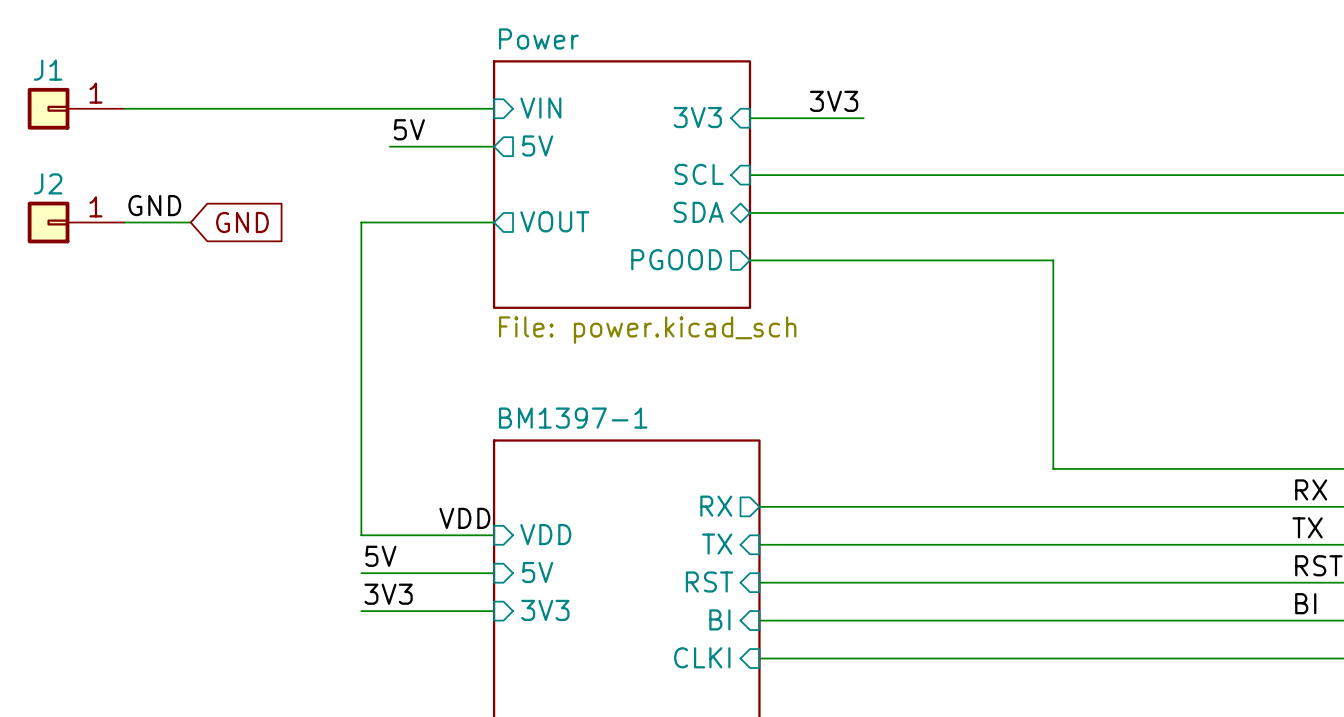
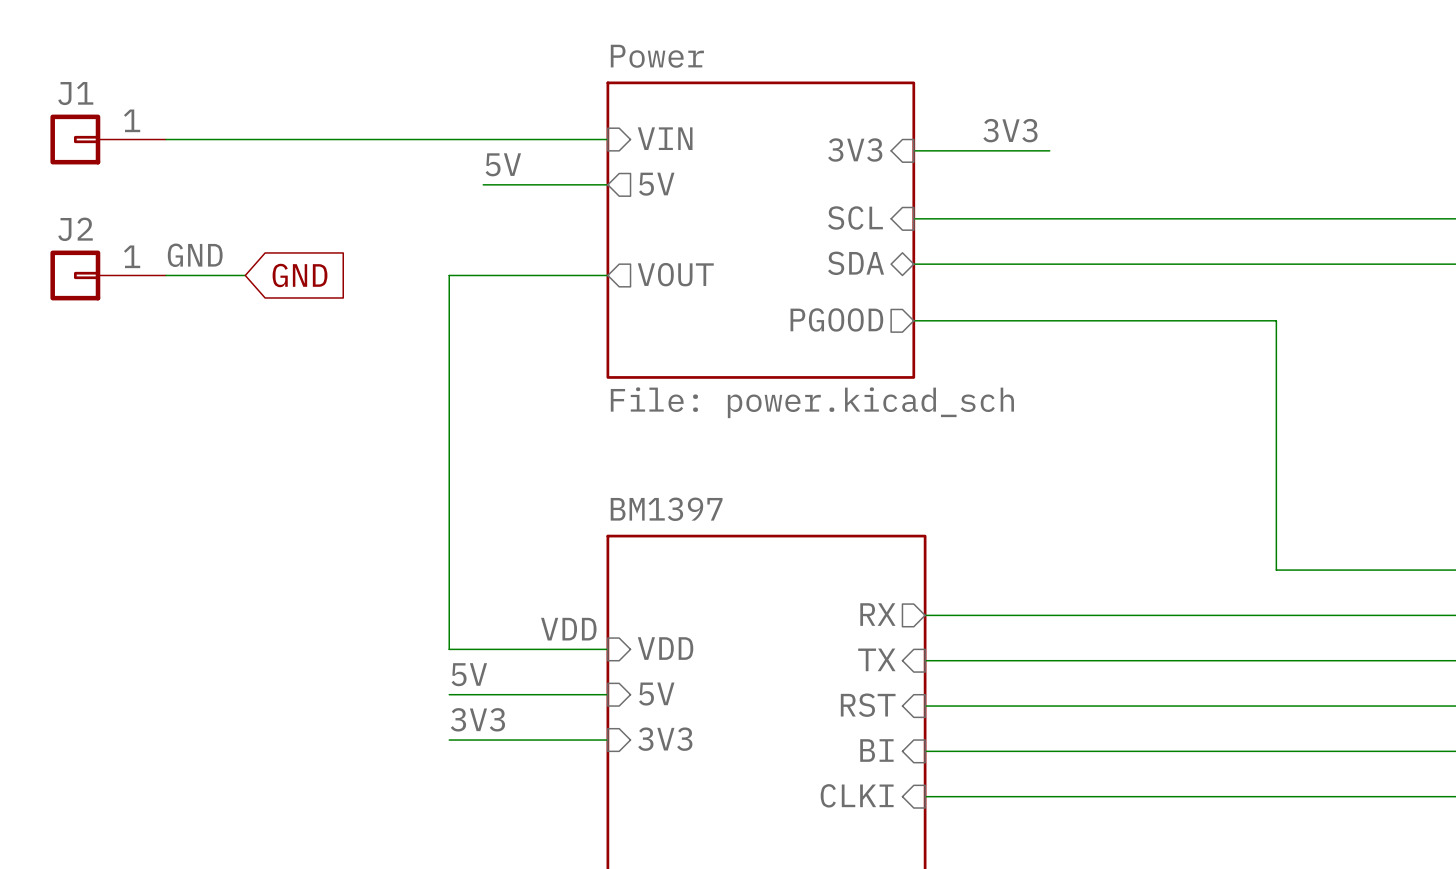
sheet BM1397-1 name: BM1397-1 (573, 418) -> BM1397 (666, 509)

